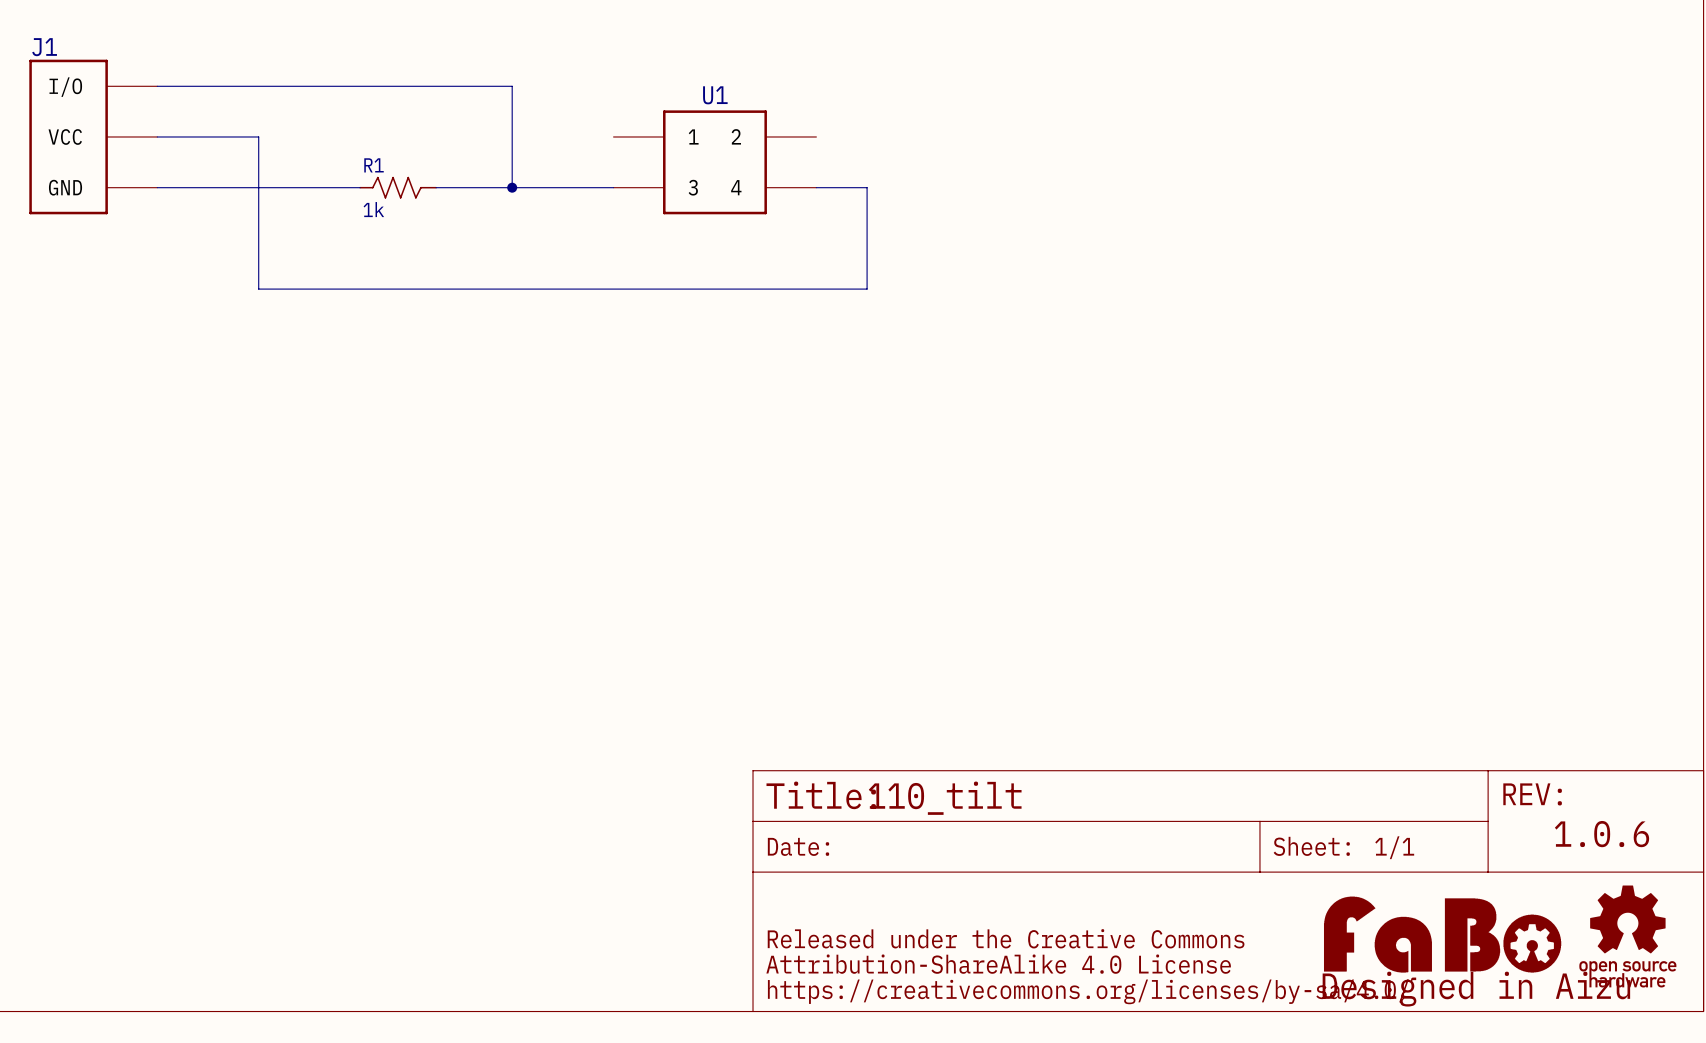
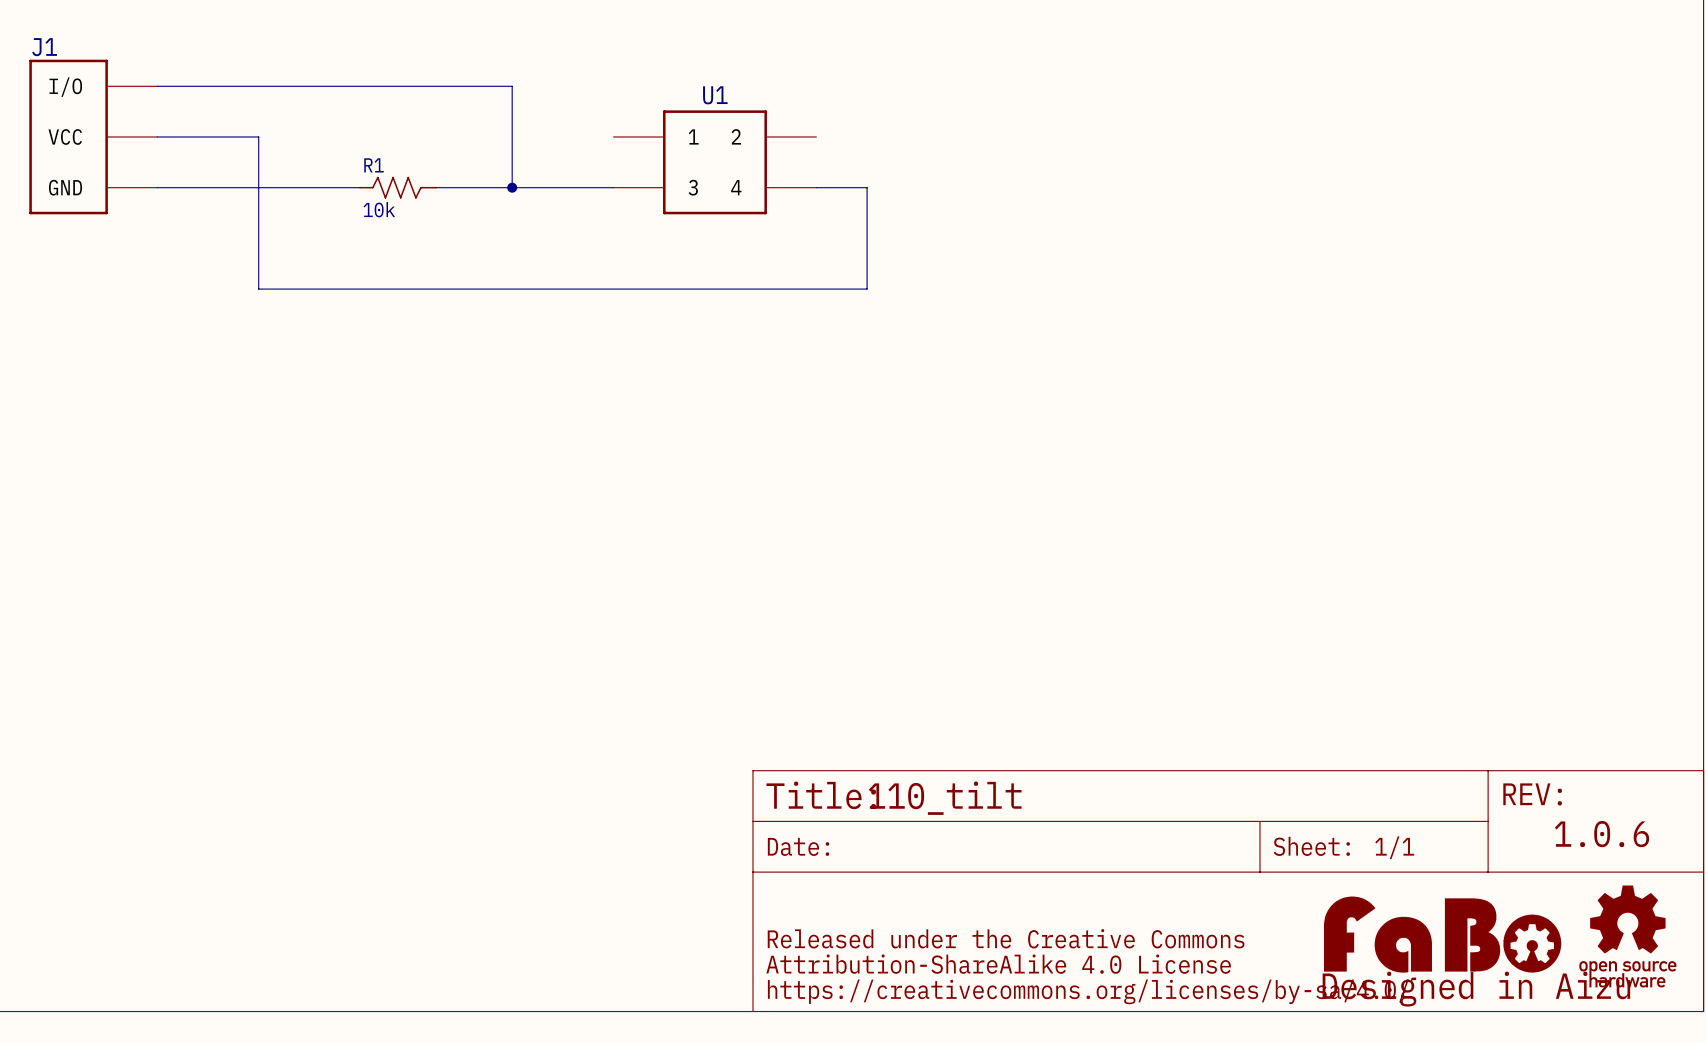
R1 value: 1k (373, 209) -> 10k (379, 209)

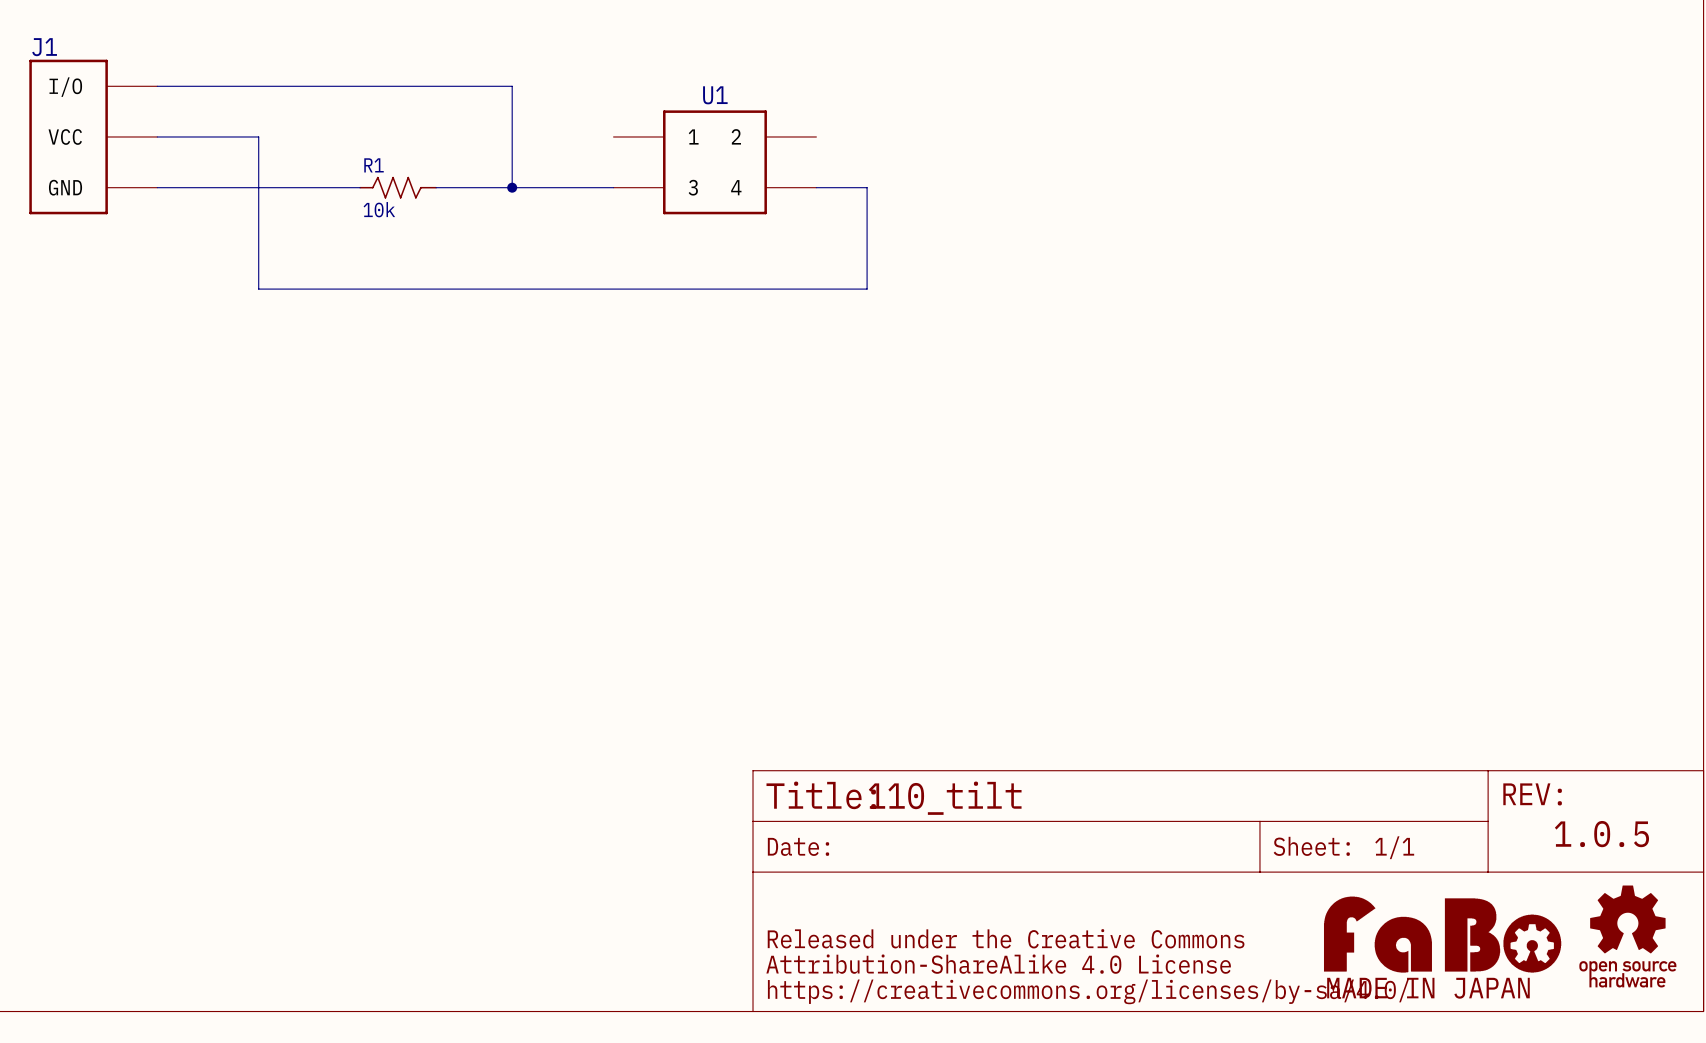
text: 1.0.6 (1602, 834) -> 1.0.5 (1601, 834)
part text: none -> MADE IN JAPAN (1428, 988)
part text: Designed in Aizu (1476, 989) -> none

